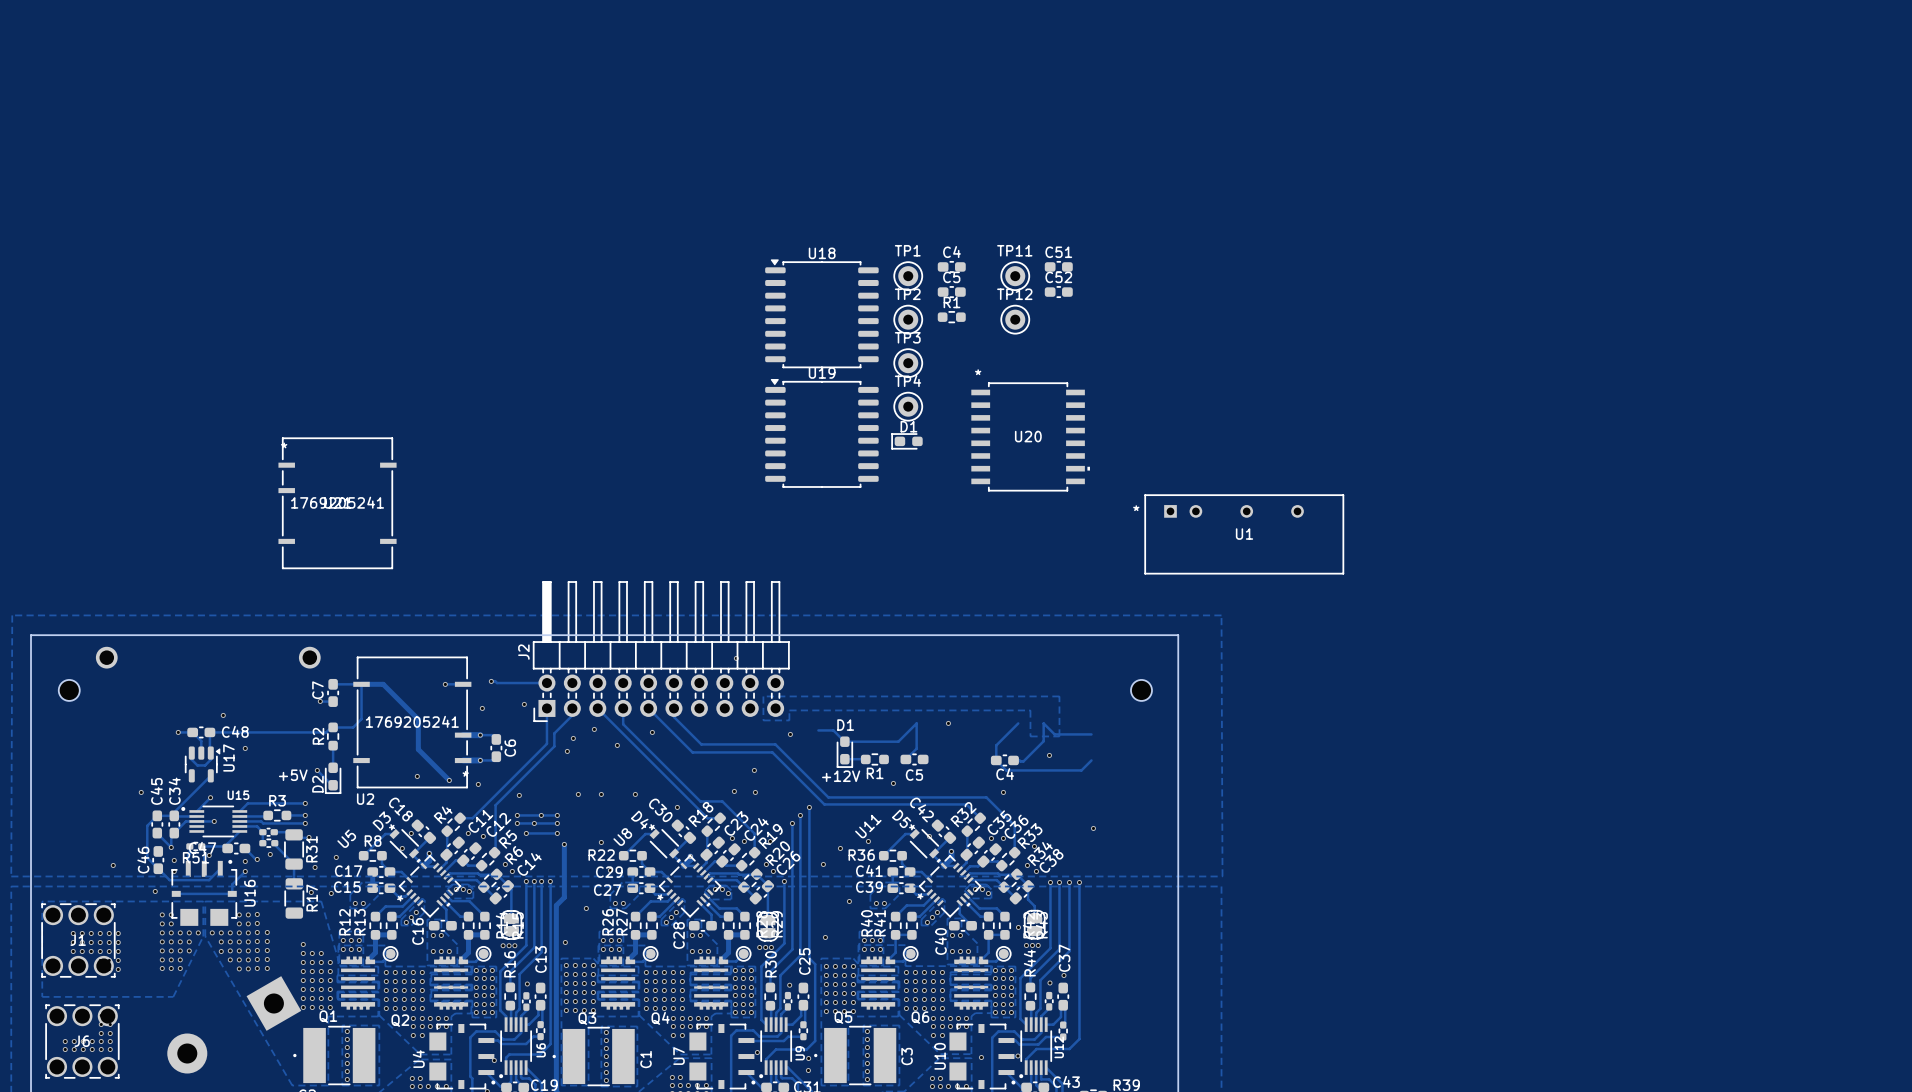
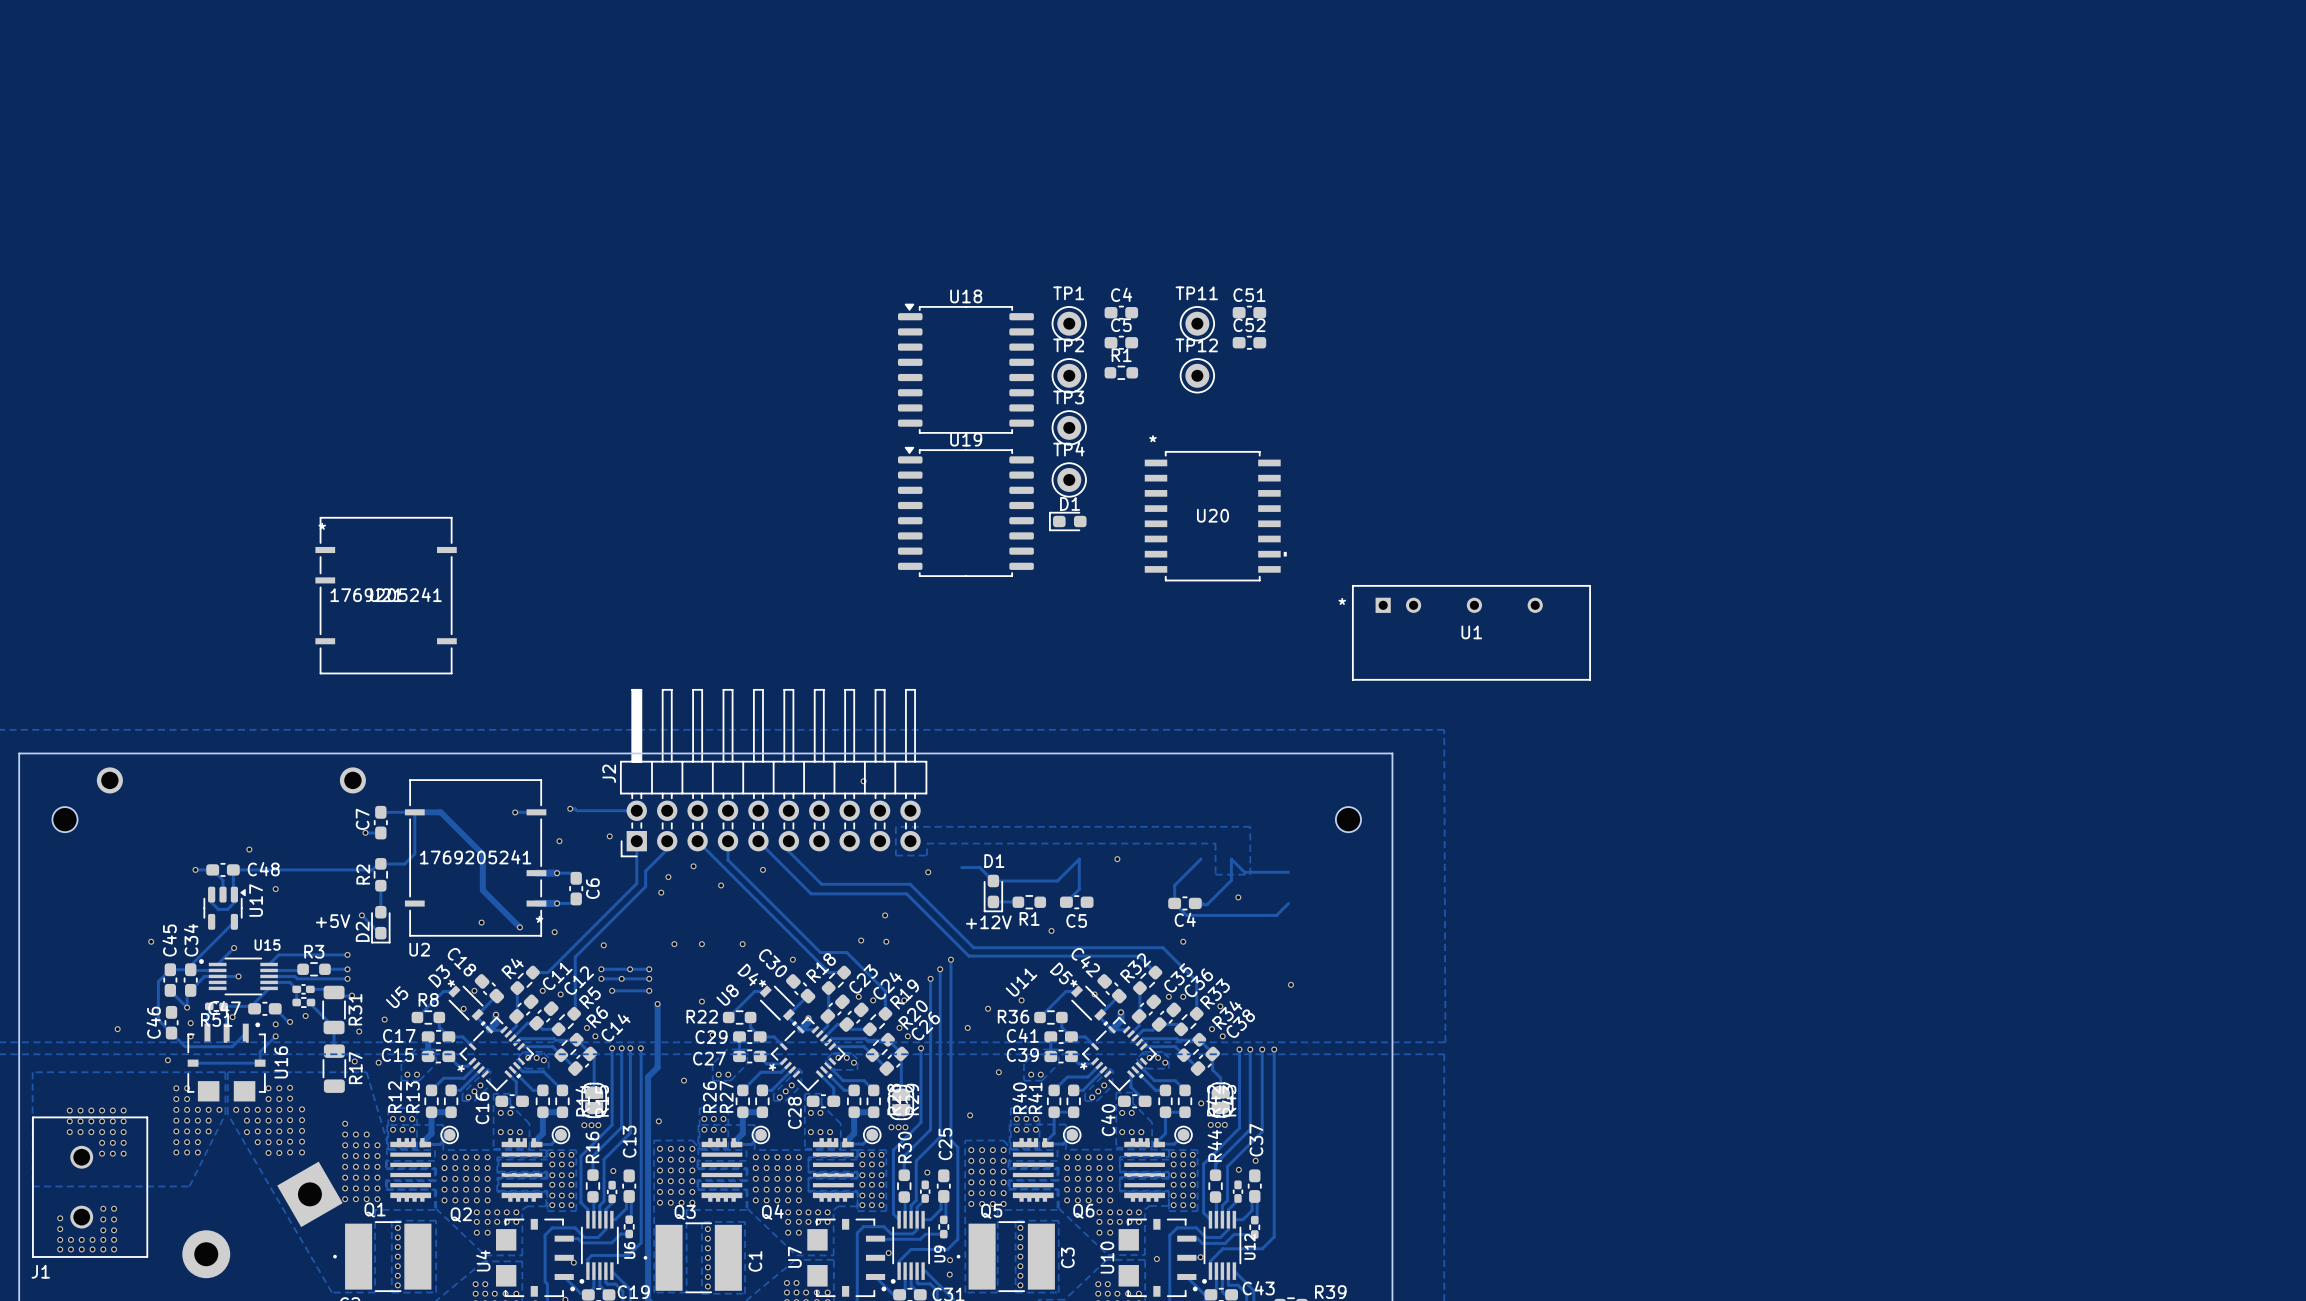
J1 footprint: [41, 903, 116, 978] -> [32, 1116, 149, 1258]
J1 name position: J1 (78, 940) -> J1 (40, 1271)
via: none -> (60, 1218)
via: none -> (60, 1229)
J6: (82, 1041) -> none

